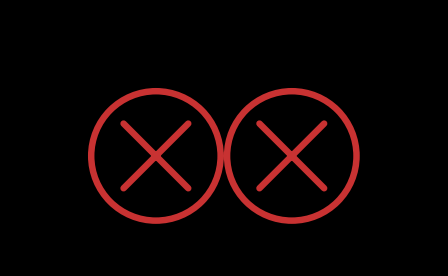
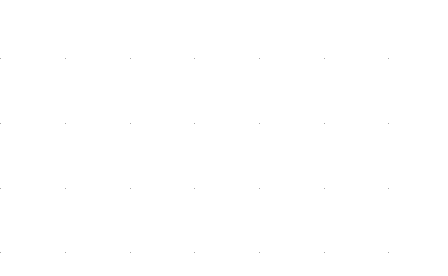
part: (155, 155) -> none
part: (291, 155) -> none

